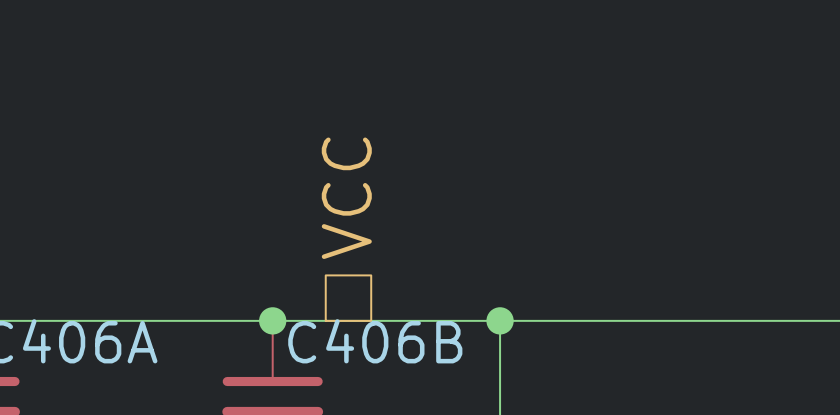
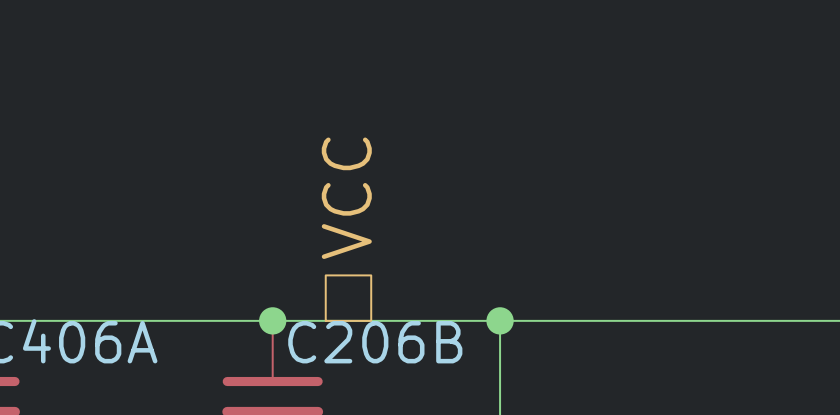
C406B name: C406B (375, 341) -> C206B (375, 342)

